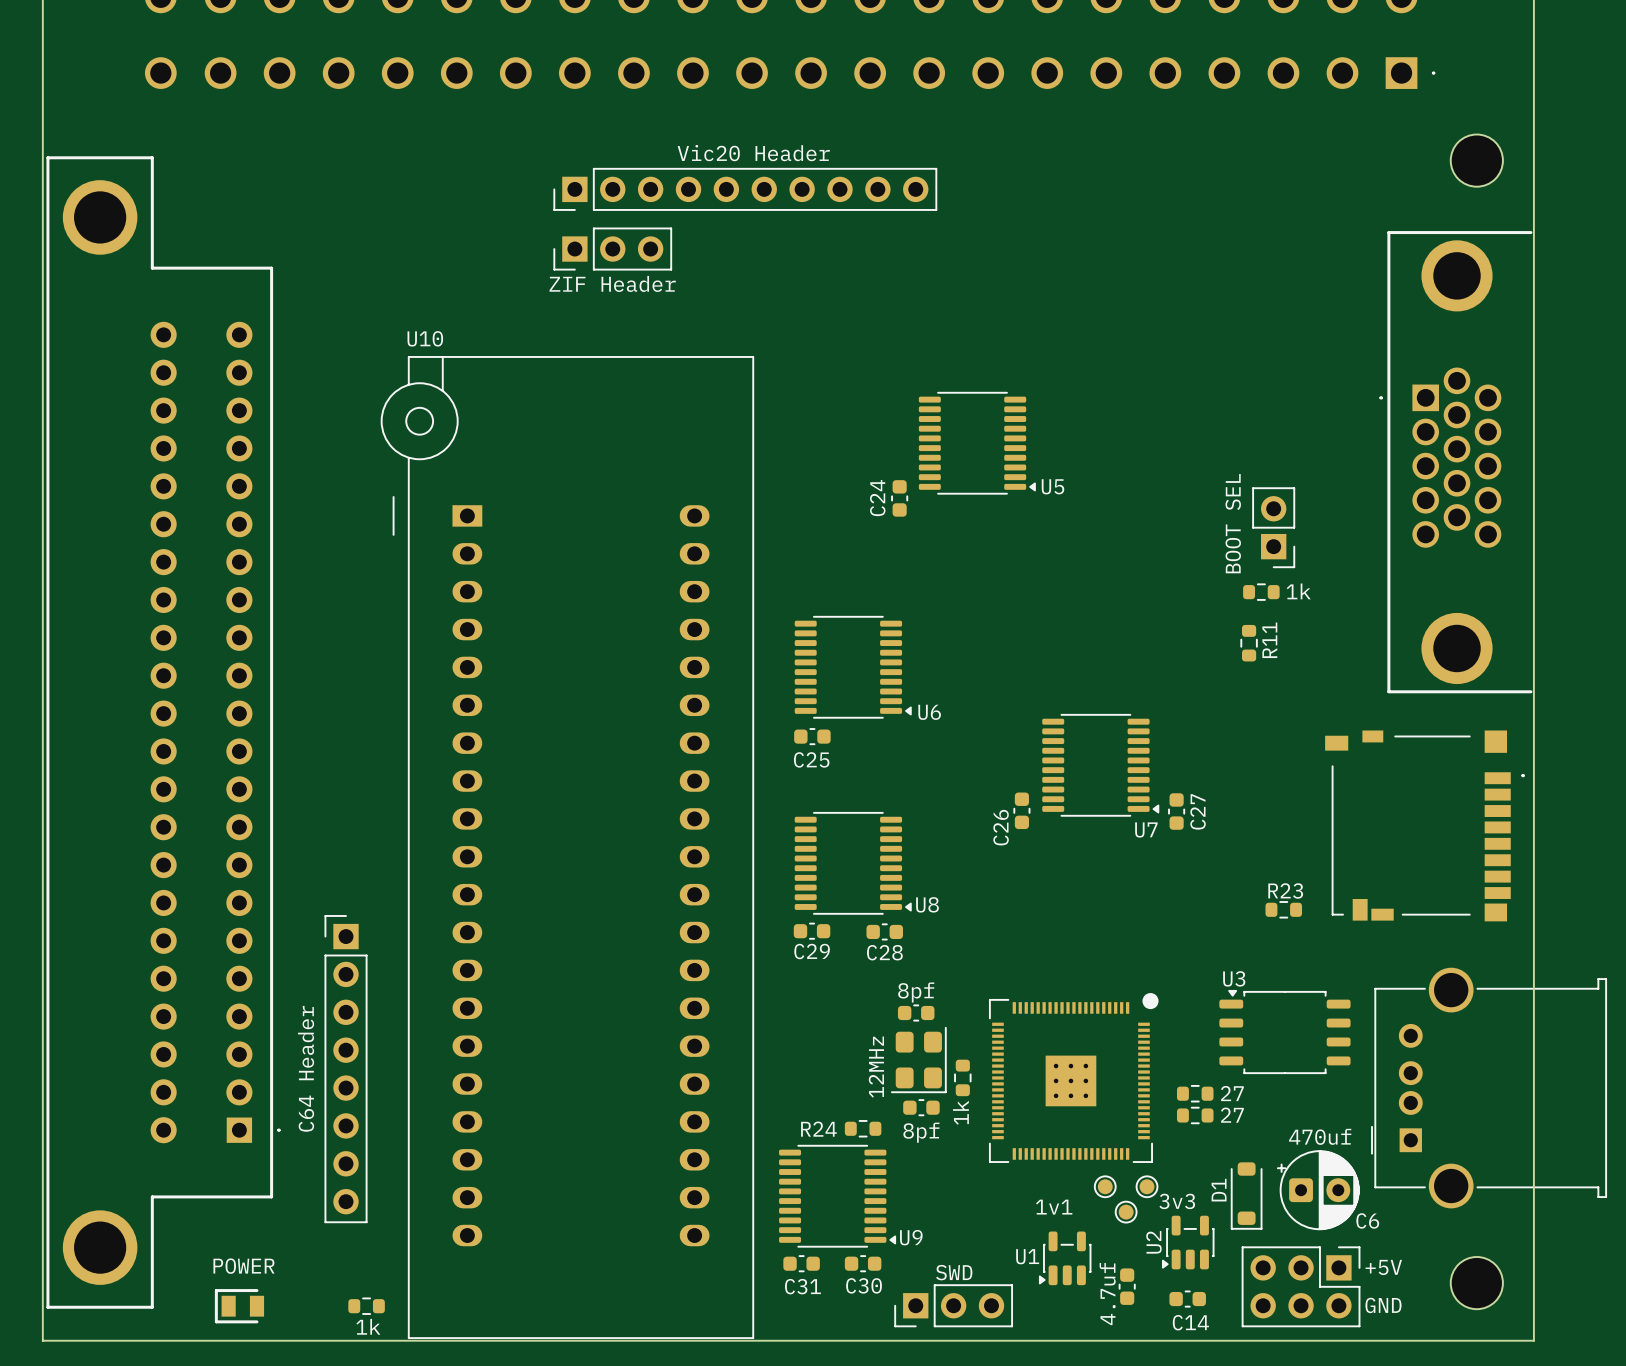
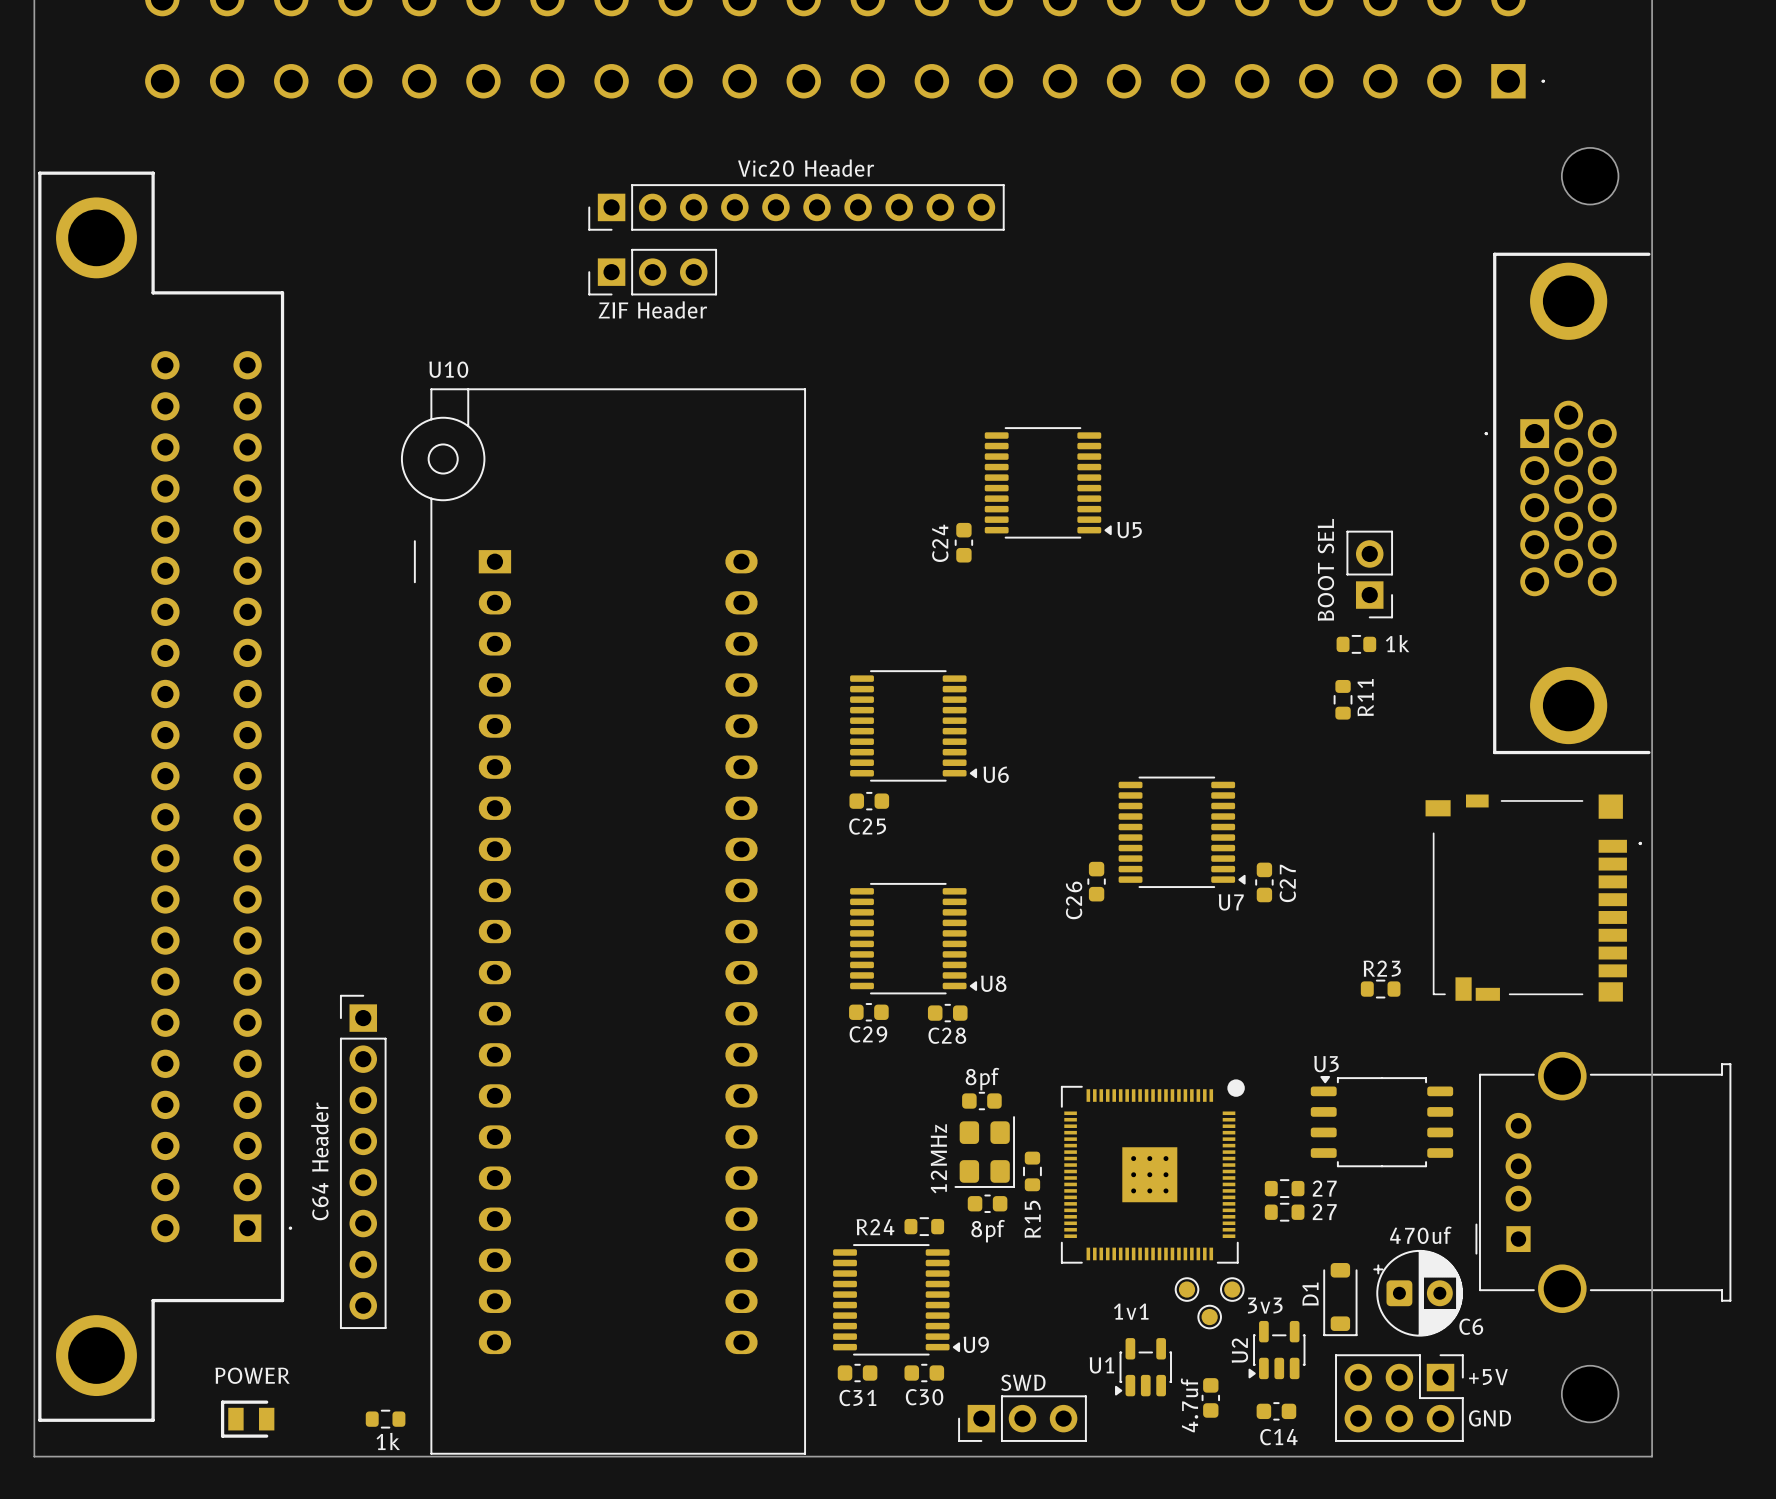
R15 value: 1k (960, 1112) -> none
R15 name: none -> R15 (1032, 1219)

